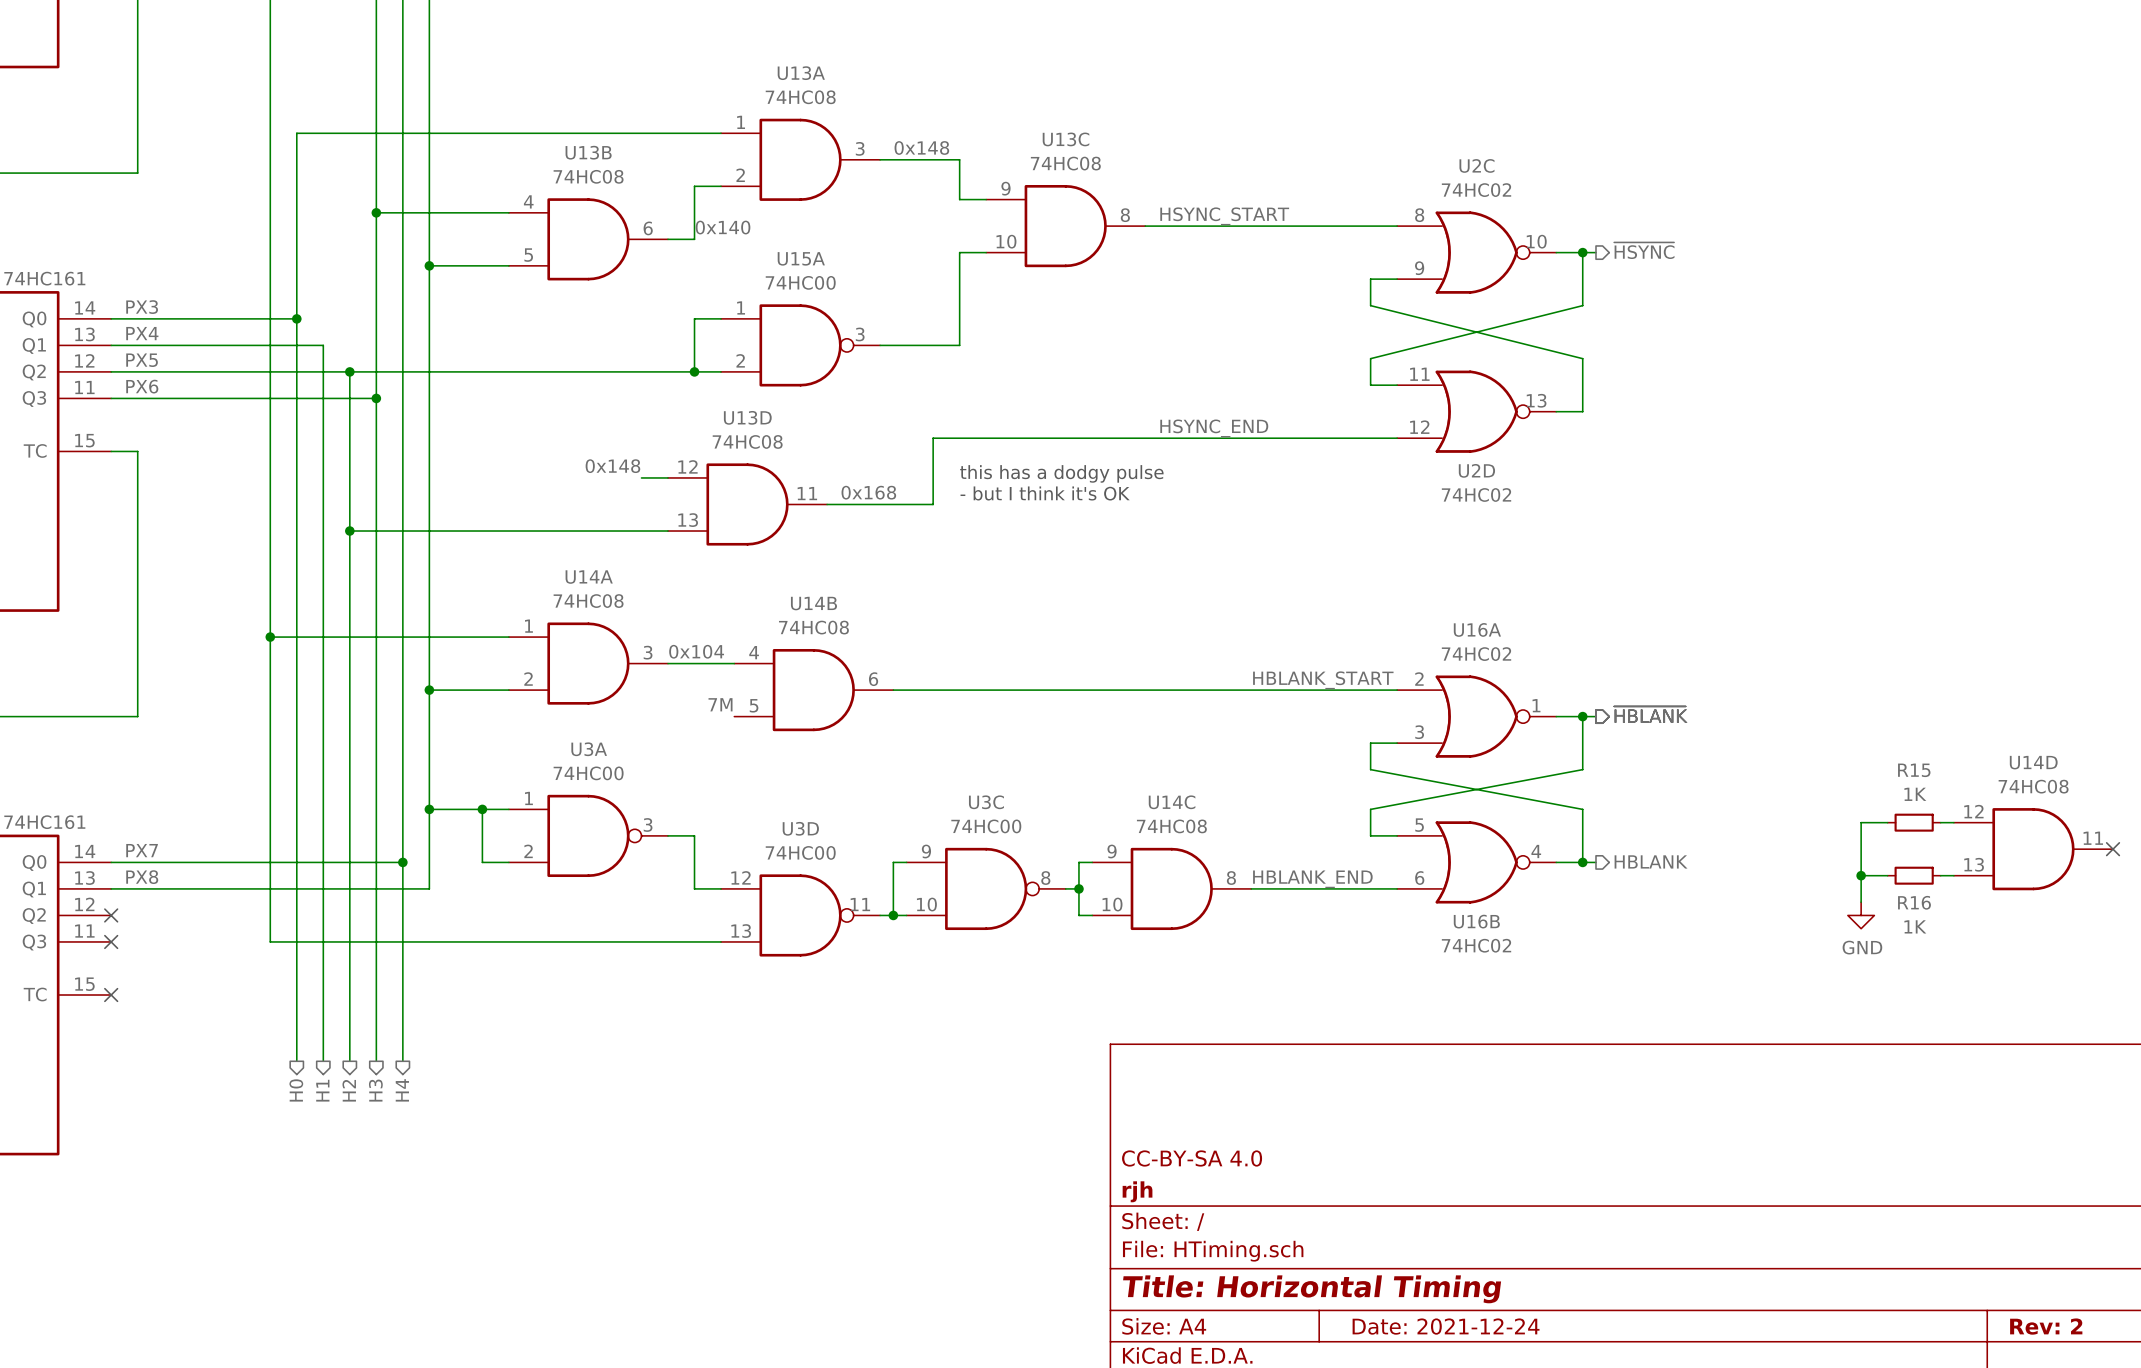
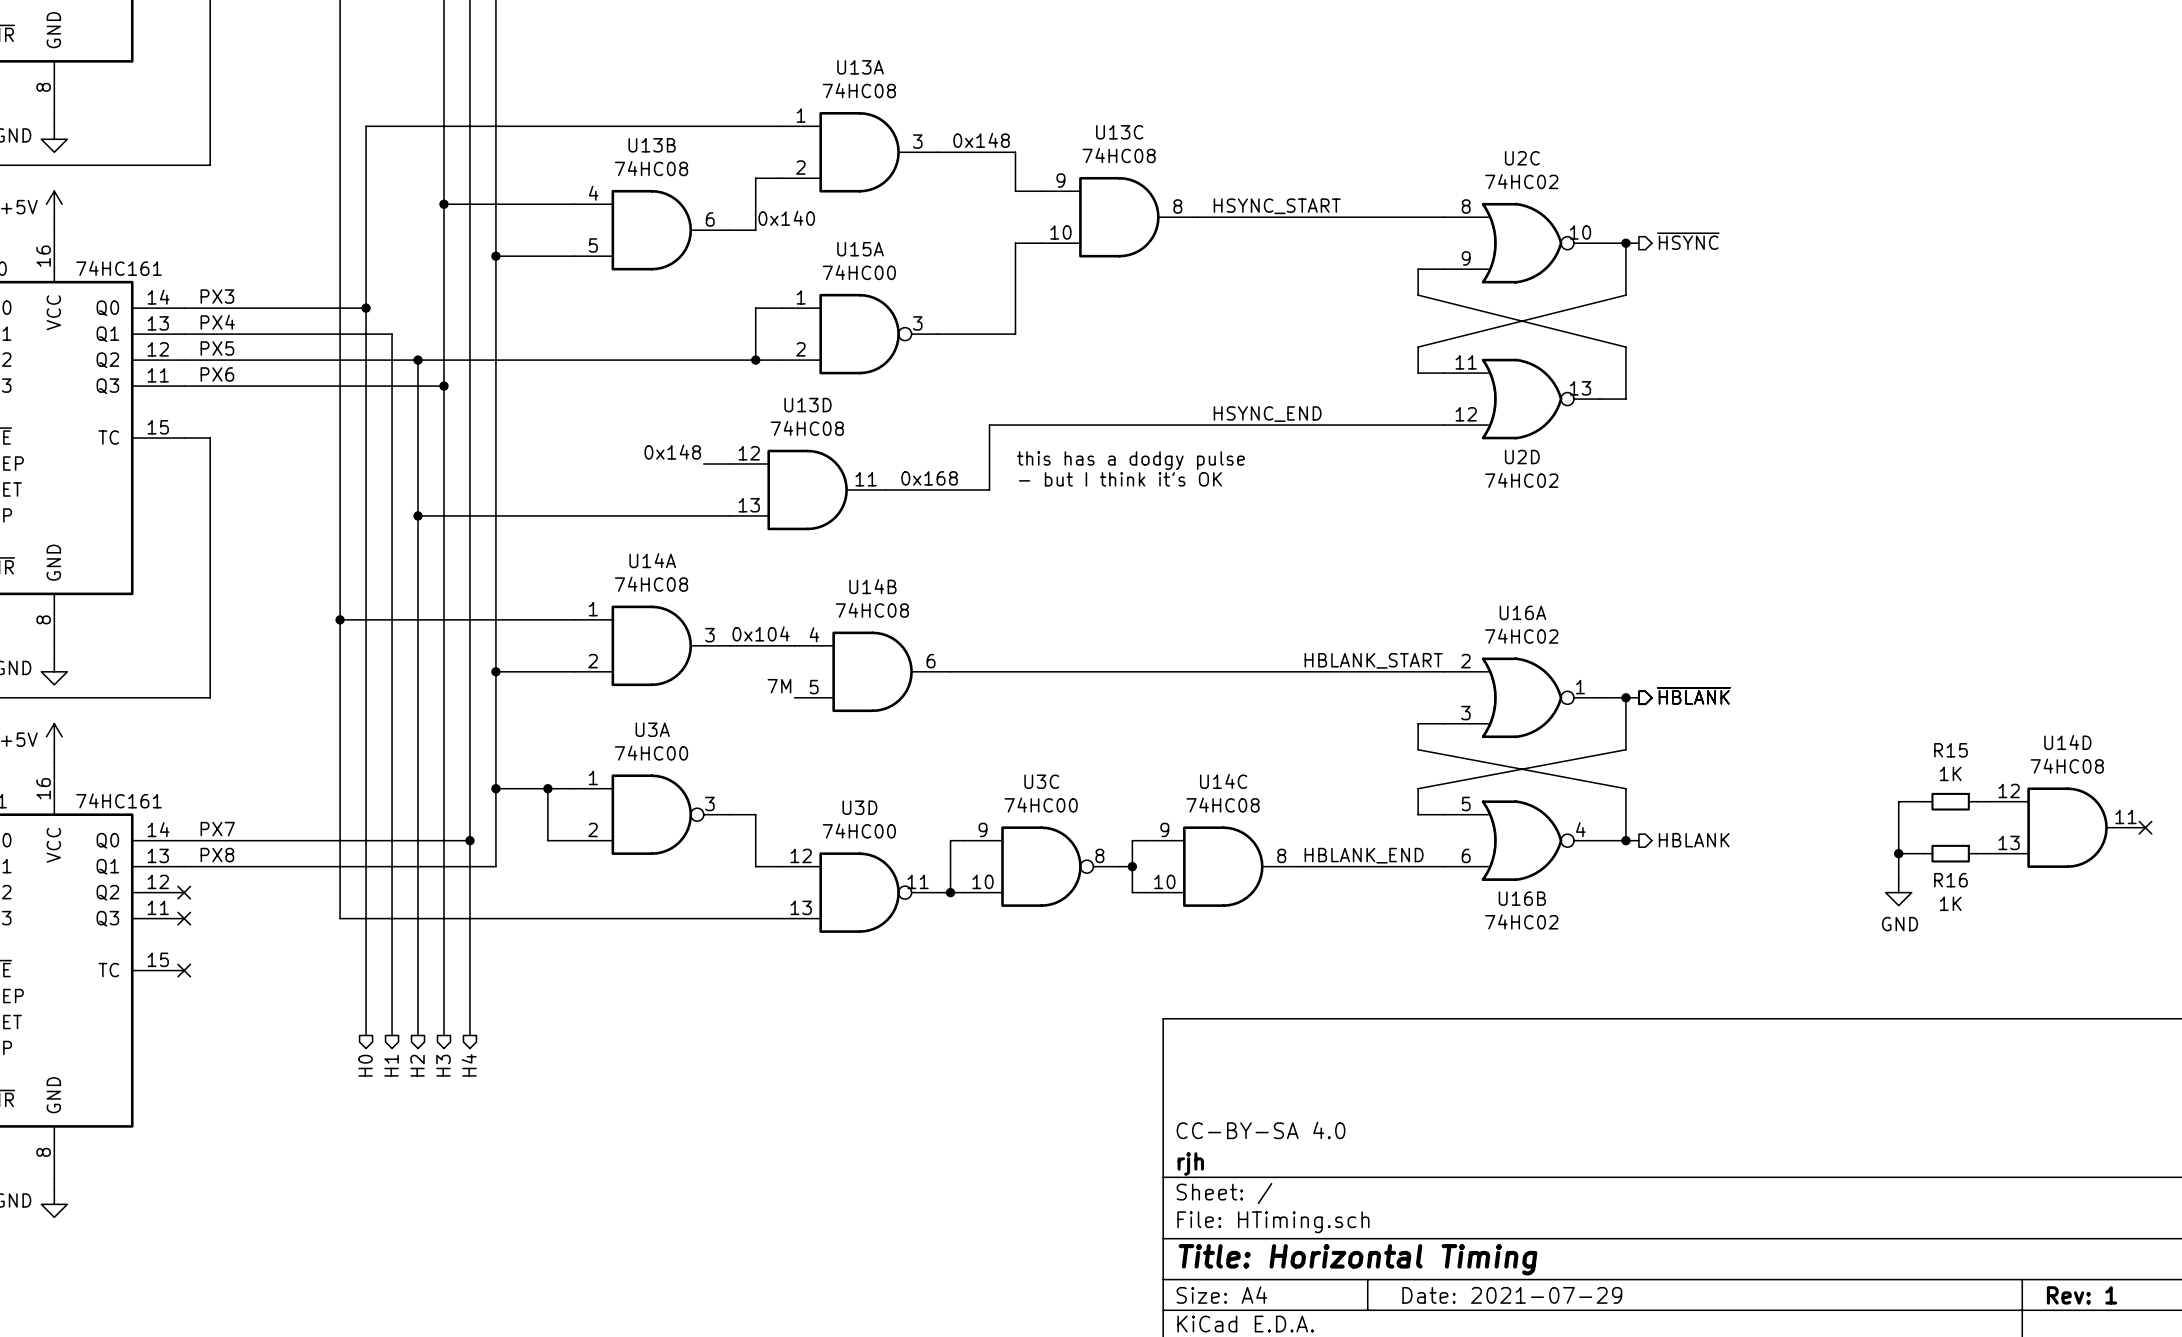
title block: Date: 2021-12-24 (1446, 1326) -> Date: 2021-07-29 (1512, 1295)
title block: Rev: 2 (2046, 1326) -> Rev: 1 (2082, 1295)

